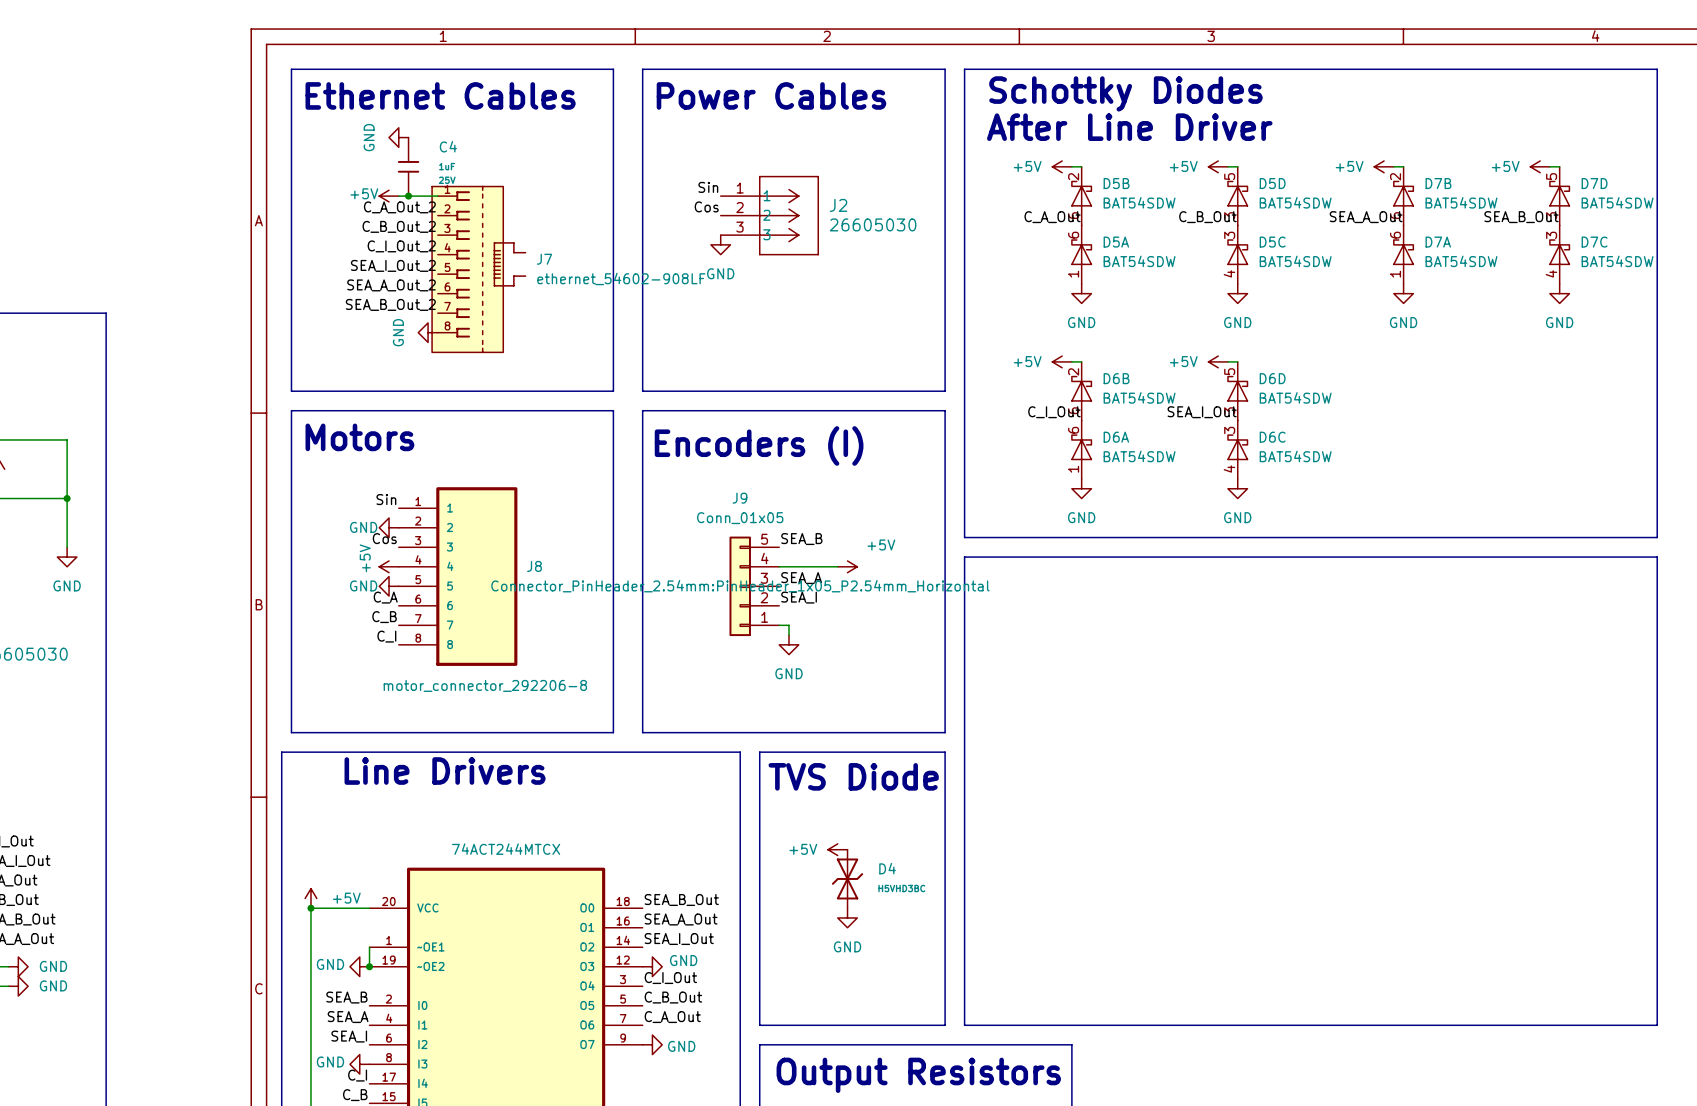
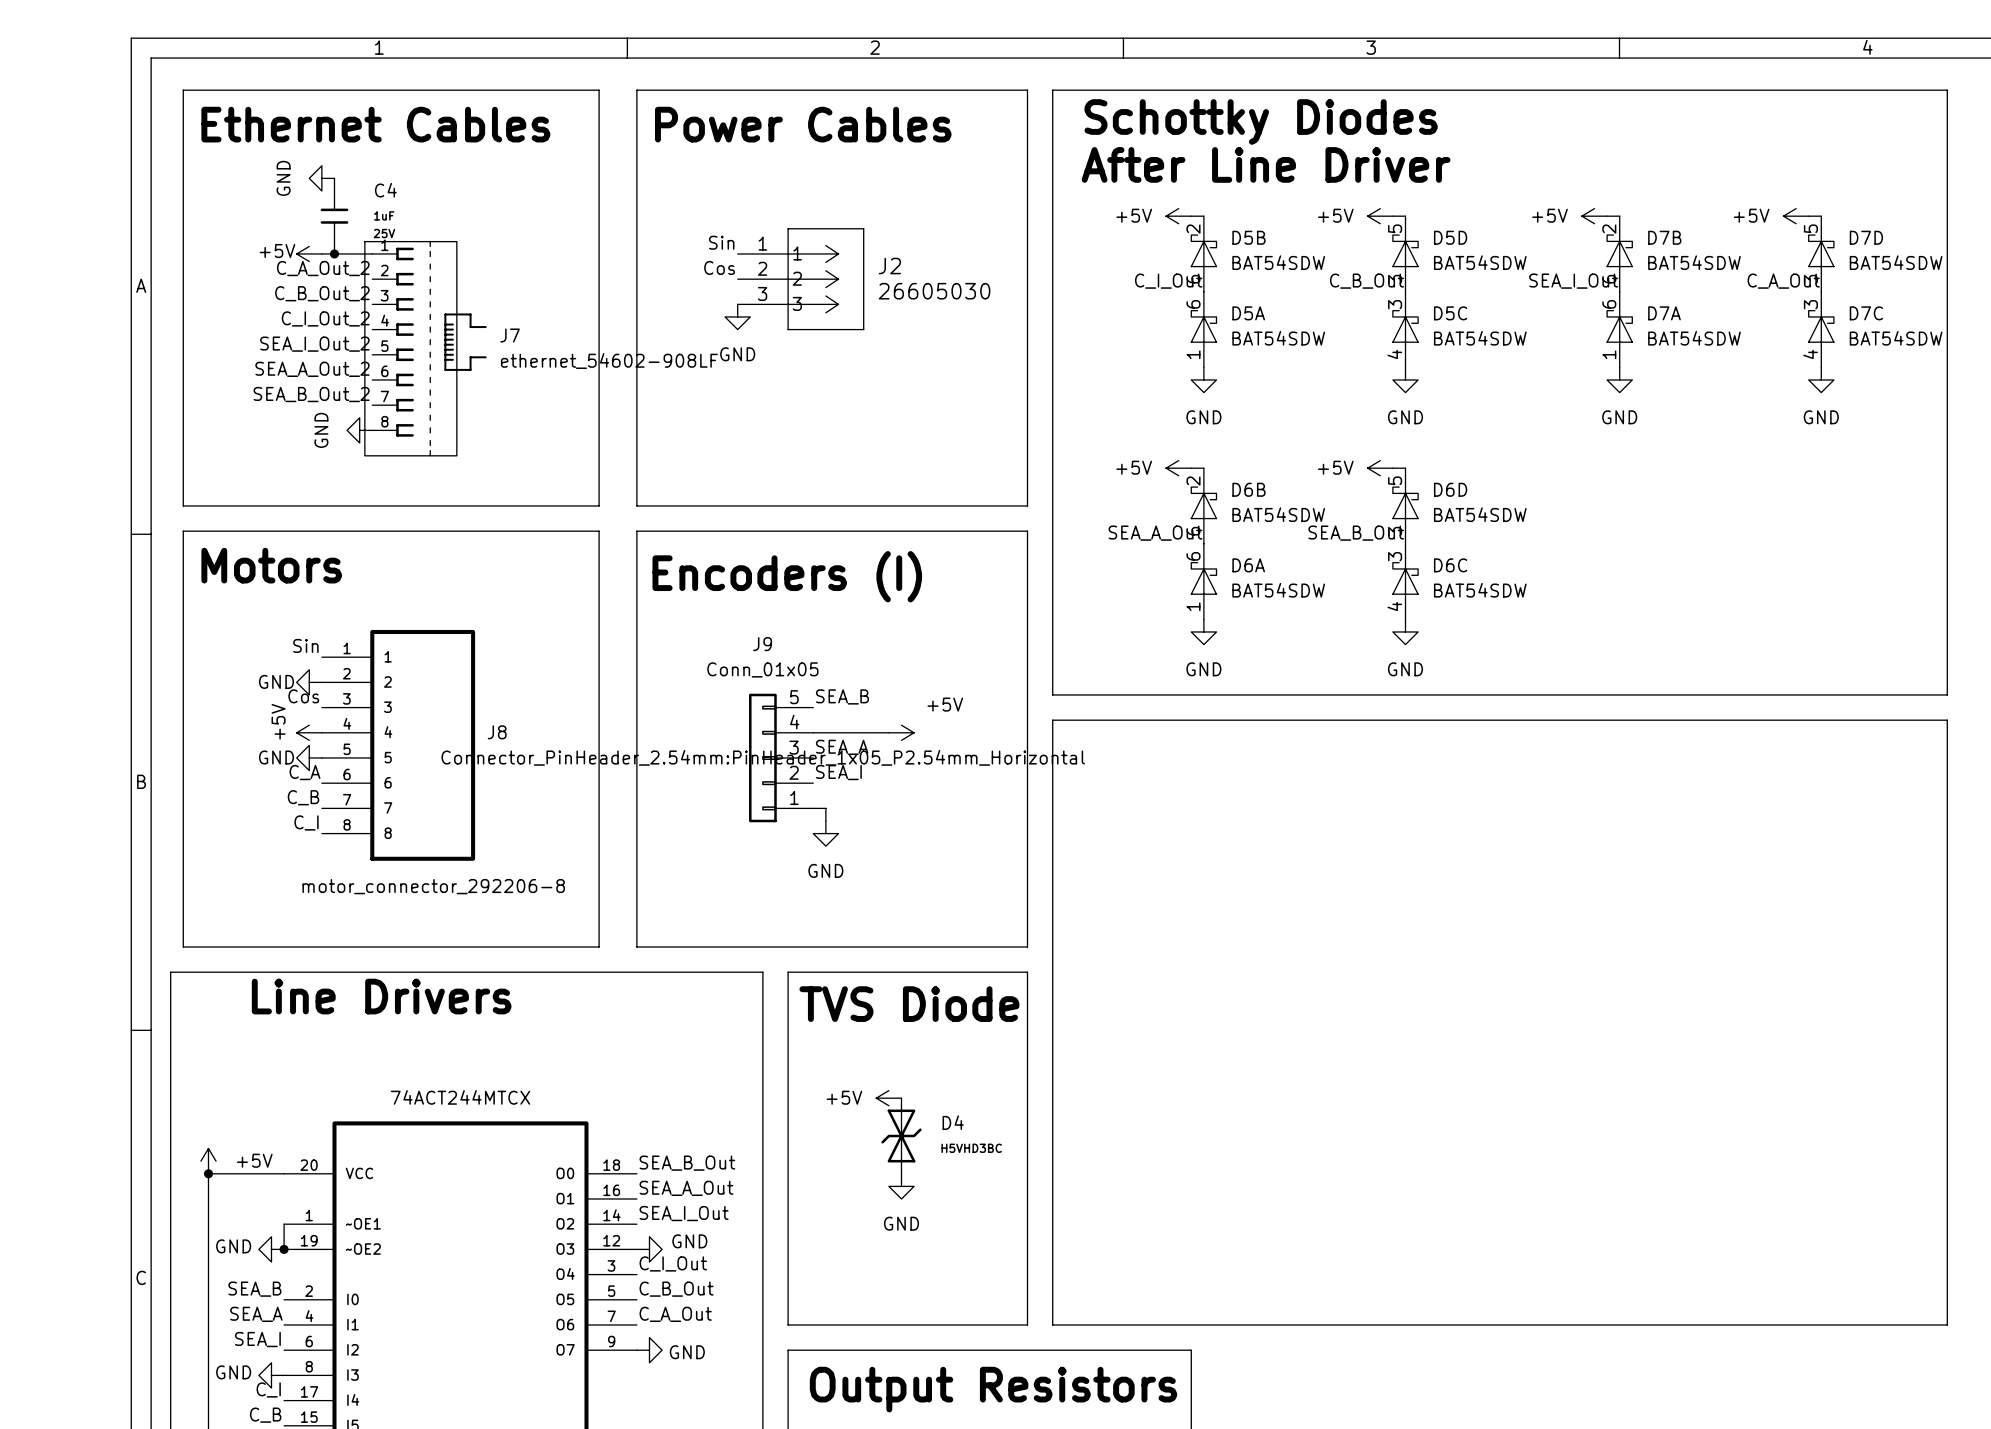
label: C_A_Out (1052, 217) -> C_I_Out (1168, 281)
label: SEA_A_Out (1366, 217) -> SEA_I_Out (1573, 281)
label: SEA_B_Out (1521, 217) -> C_A_Out (1783, 281)
label: C_I_Out (1054, 412) -> SEA_A_Out (1155, 533)
label: SEA_I_Out (1202, 412) -> SEA_B_Out (1356, 533)

